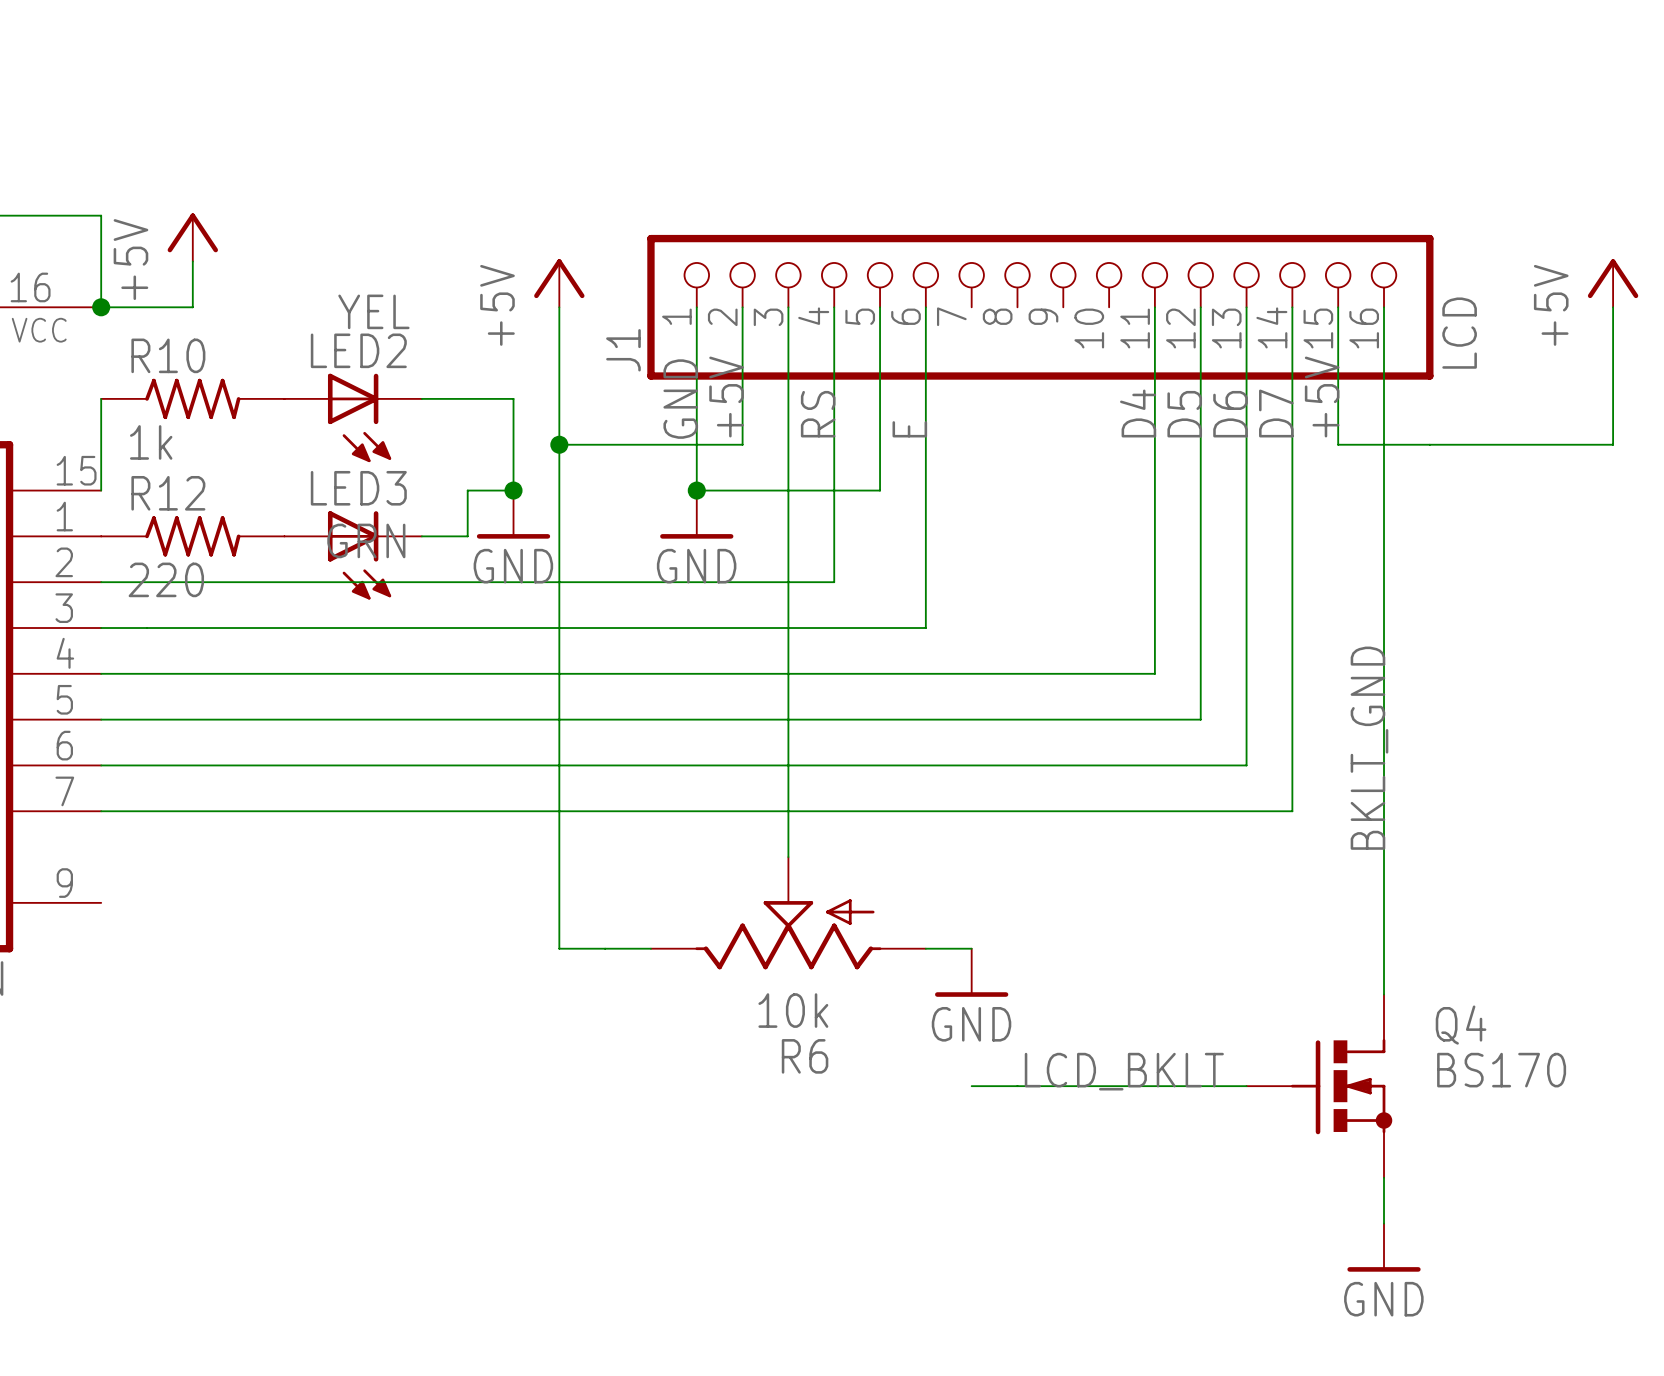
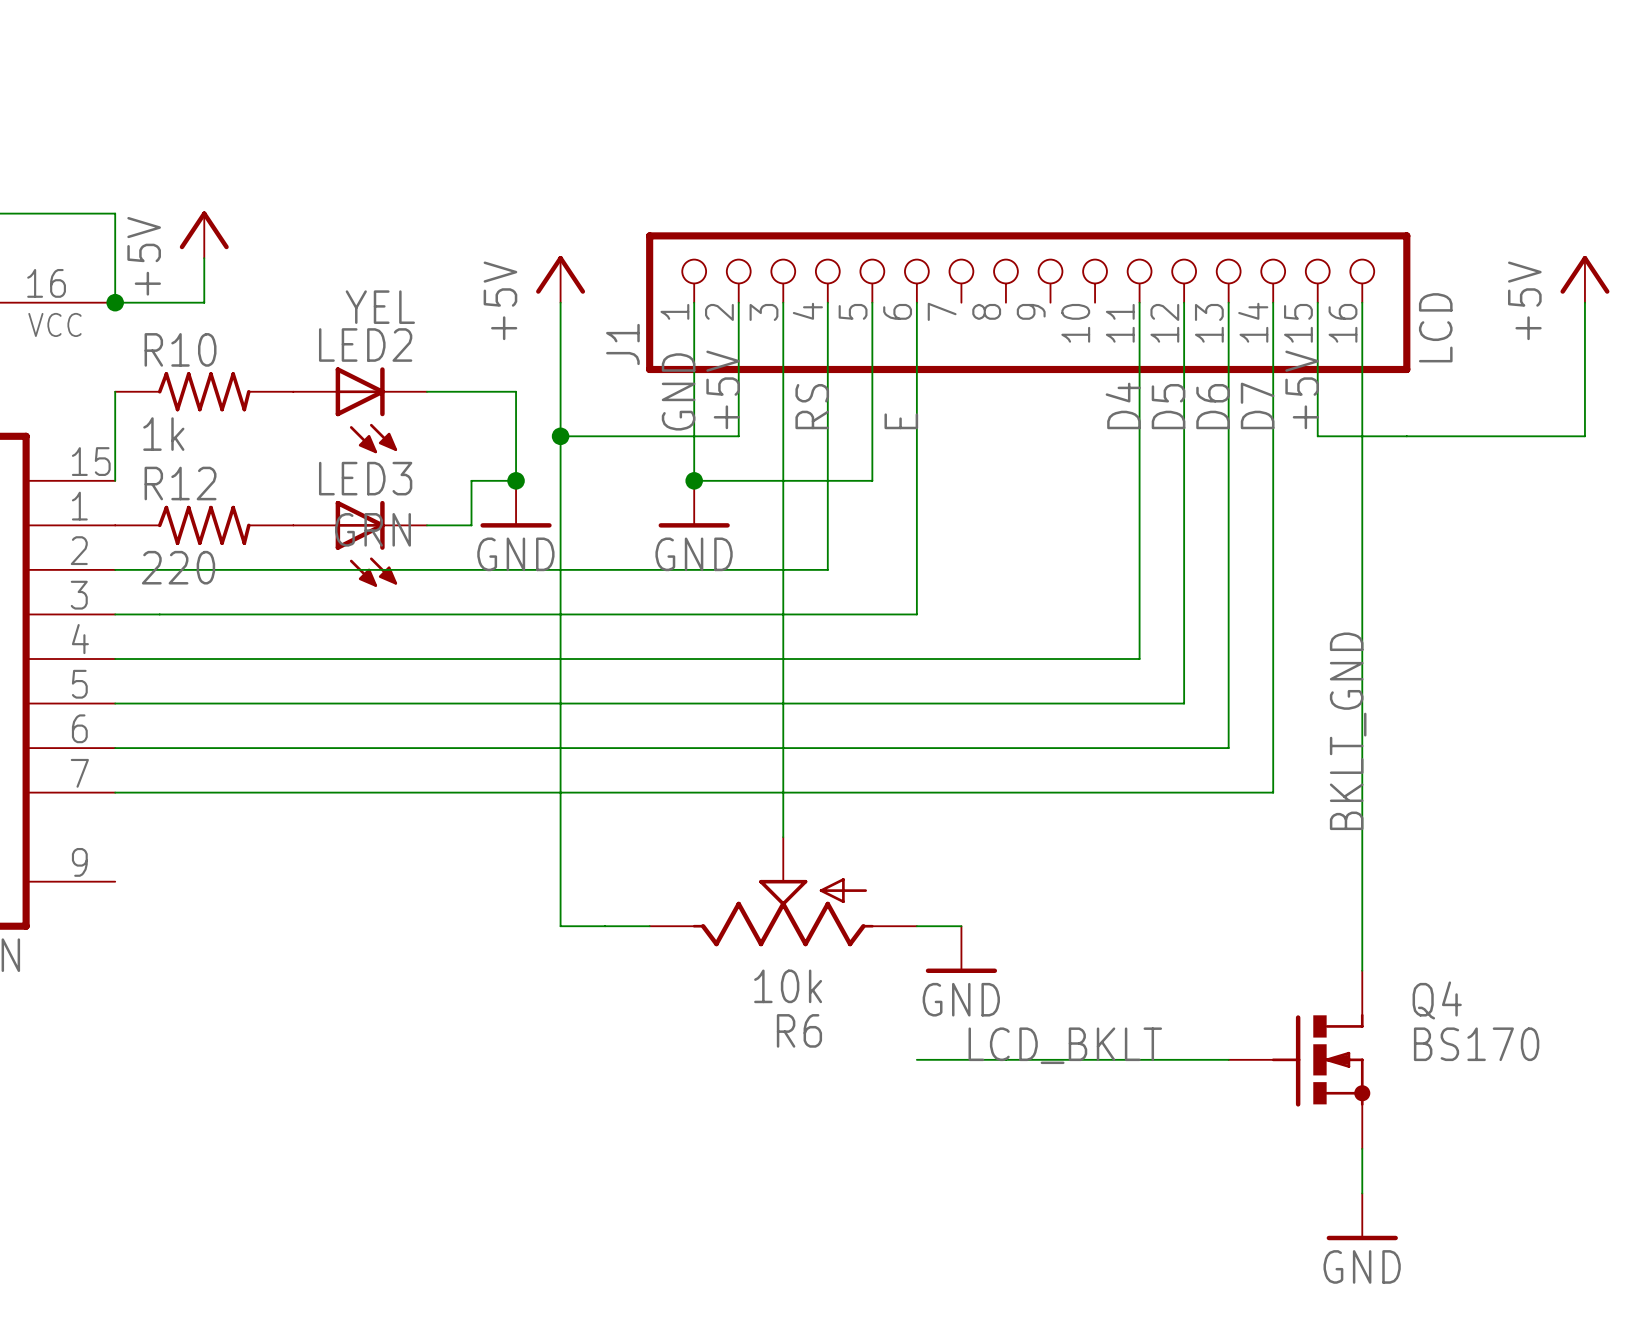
label position: LCD_BKLT (1124, 1071) -> LCD_BKLT (1065, 1045)
wire: none -> (916, 1059) (961, 1059)

